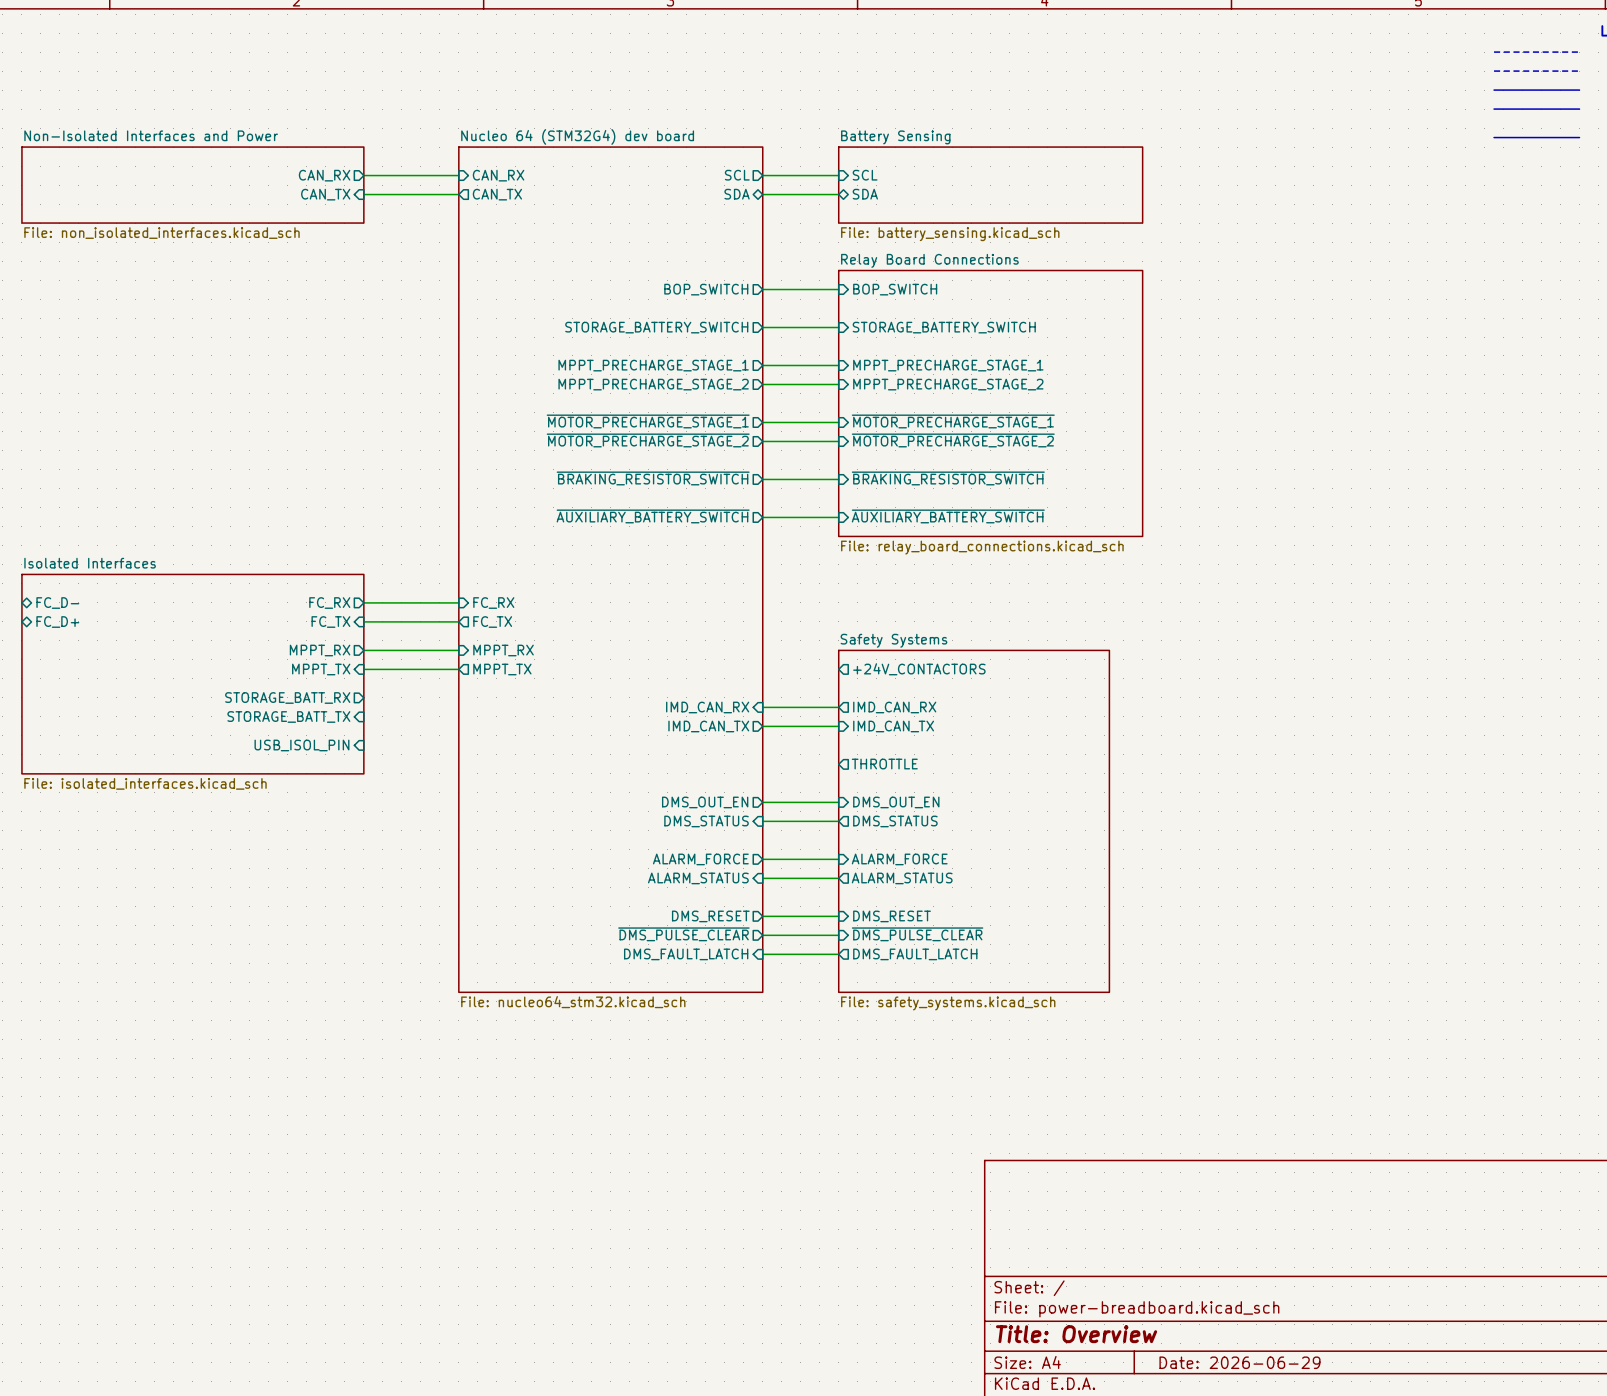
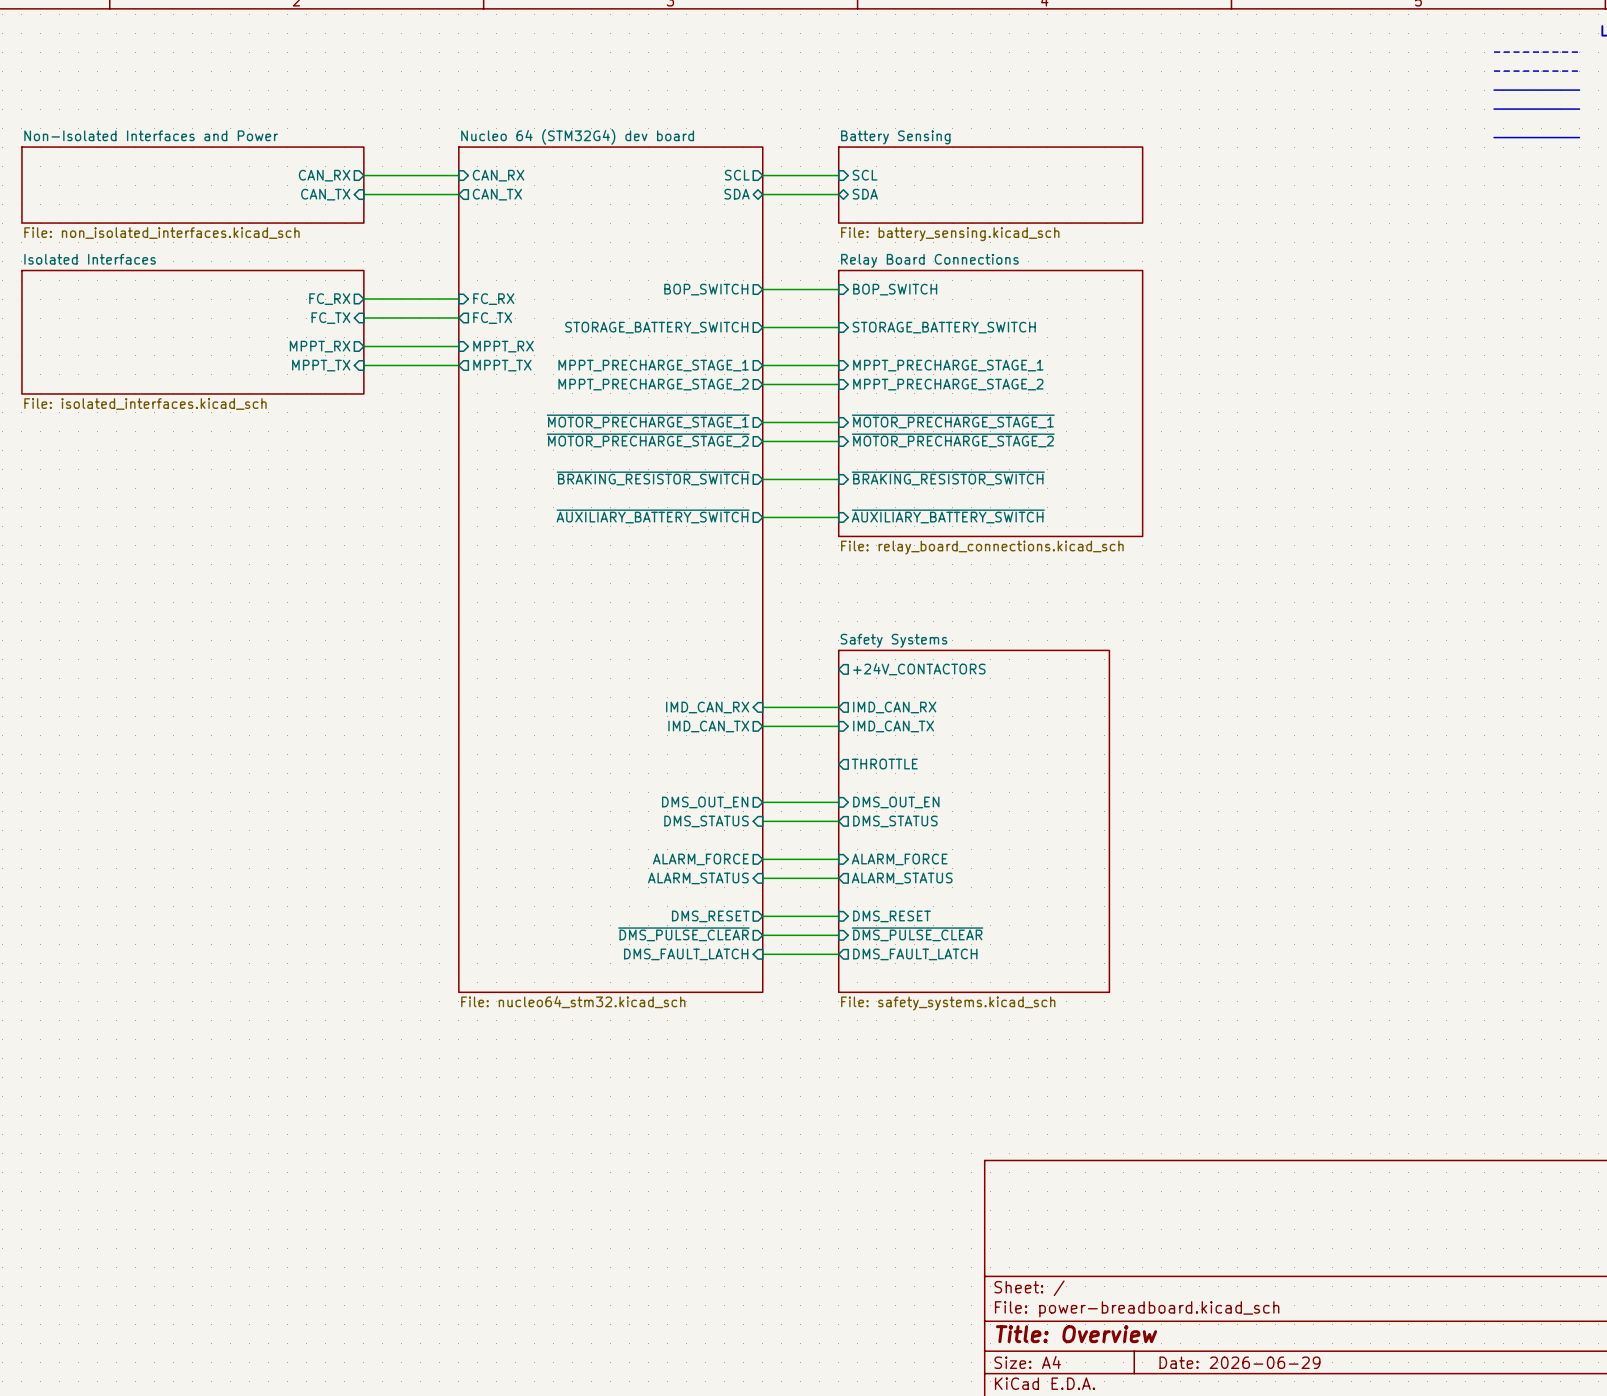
sheet pin: none -> FC_RX (329, 299)
wire: none -> (363, 299) (458, 299)
sheet pin: none -> FC_RX (493, 299)
sheet pin: none -> FC_TX (330, 318)
wire: none -> (363, 318) (458, 318)
sheet pin: none -> FC_TX (492, 318)
sheet Isolated Interfaces: none -> File: isolated_interfaces.kicad_sch (192, 332)
sheet pin: none -> MPPT_RX (320, 346)
wire: none -> (363, 346) (458, 346)
sheet pin: none -> MPPT_RX (503, 346)
sheet pin: none -> MPPT_TX (321, 365)
wire: none -> (363, 365) (458, 365)
sheet pin: none -> MPPT_TX (502, 365)
wire: (363, 602) (458, 602) -> none
sheet pin: FC_D- (57, 603) -> none
sheet pin: FC_RX (329, 603) -> none
sheet pin: FC_RX (493, 603) -> none
wire: (363, 621) (458, 621) -> none
sheet pin: FC_D+ (57, 622) -> none
sheet pin: FC_TX (330, 622) -> none
sheet pin: FC_TX (492, 622) -> none
sheet pin: MPPT_RX (320, 650) -> none
wire: (363, 650) (458, 650) -> none
sheet pin: MPPT_RX (503, 650) -> none
sheet pin: MPPT_TX (321, 669) -> none
wire: (363, 669) (458, 669) -> none
sheet pin: MPPT_TX (502, 669) -> none
sheet Isolated Interfaces: File: isolated_interfaces.kicad_sch (192, 674) -> none
sheet pin: STORAGE_BATT_RX (287, 697) -> none
sheet pin: STORAGE_BATT_TX (288, 716) -> none
sheet pin: USB_ISOL_PIN (301, 745) -> none

